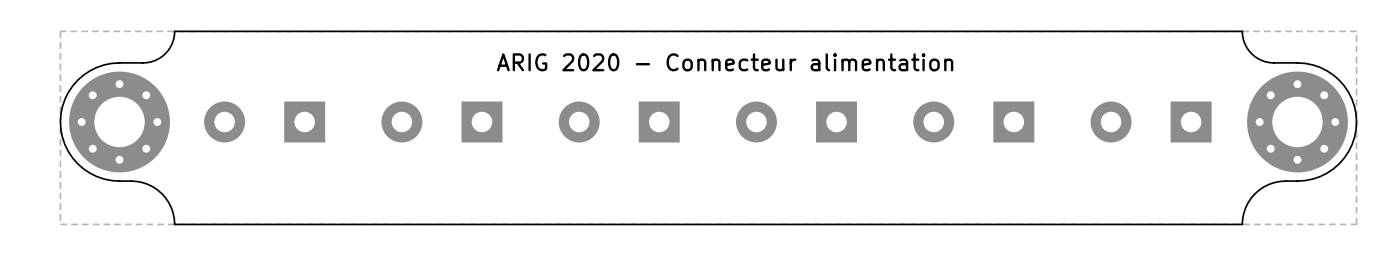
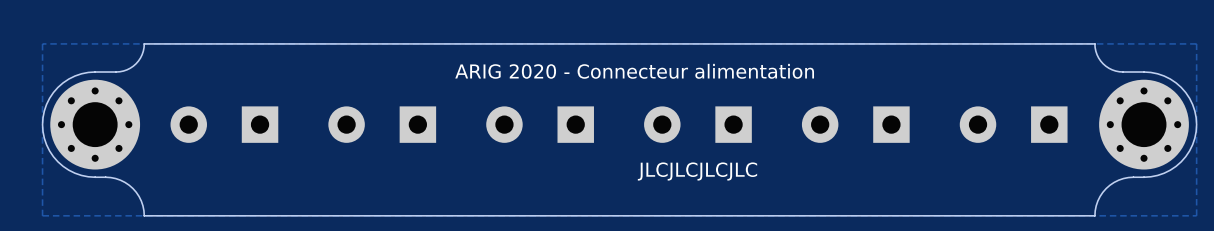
text: none -> JLCJLCJLCJLC (697, 171)

